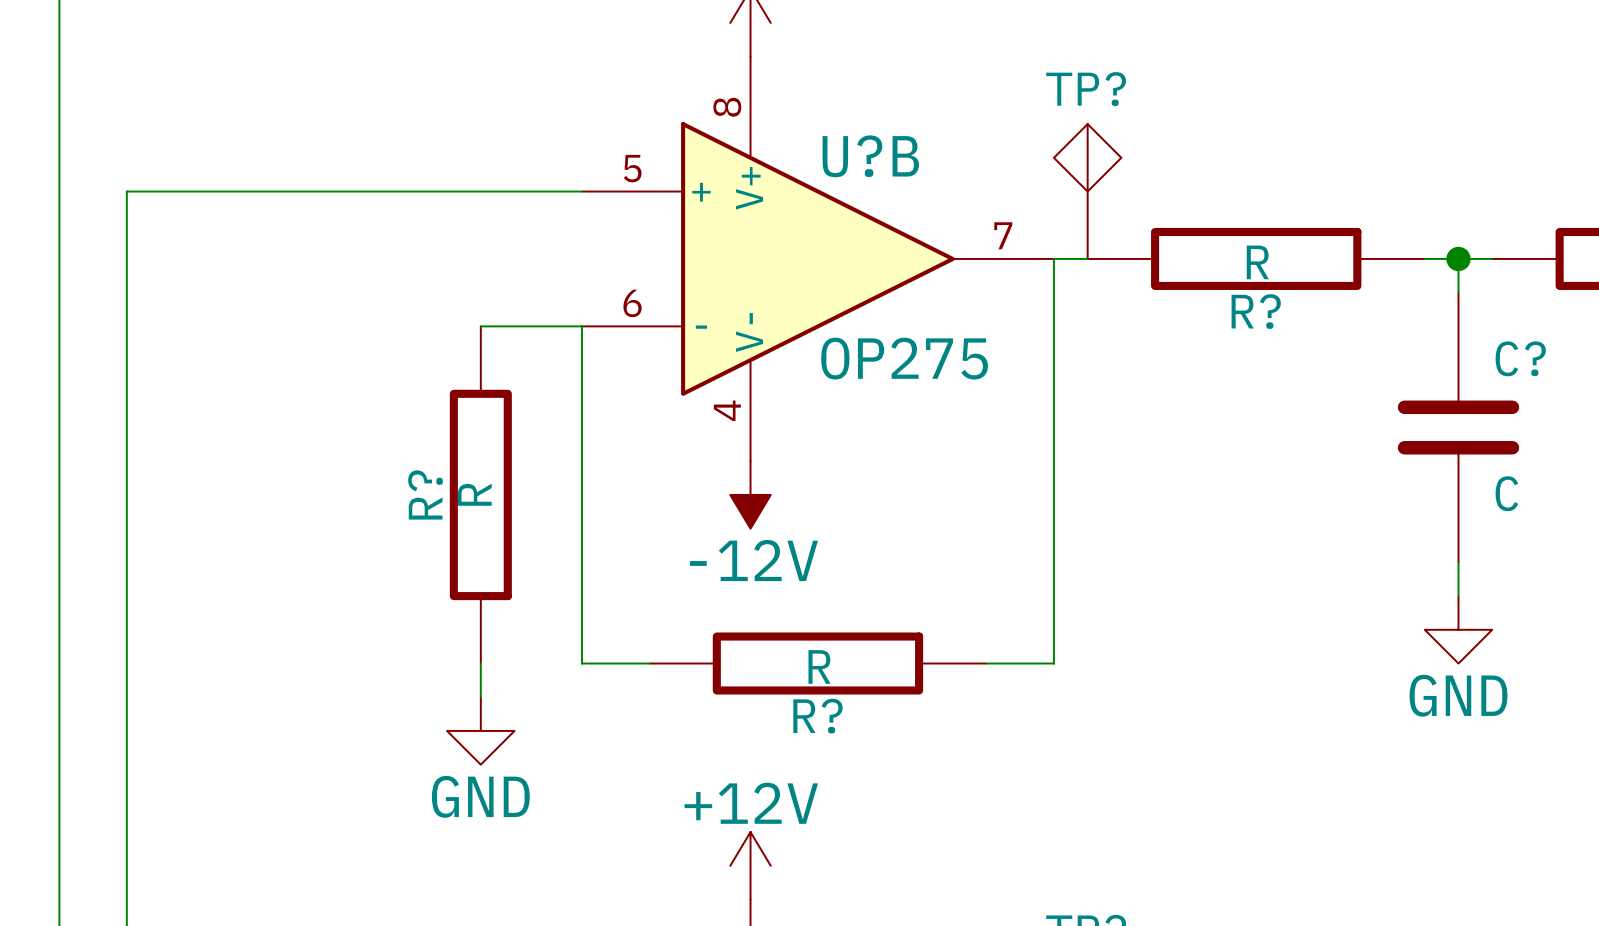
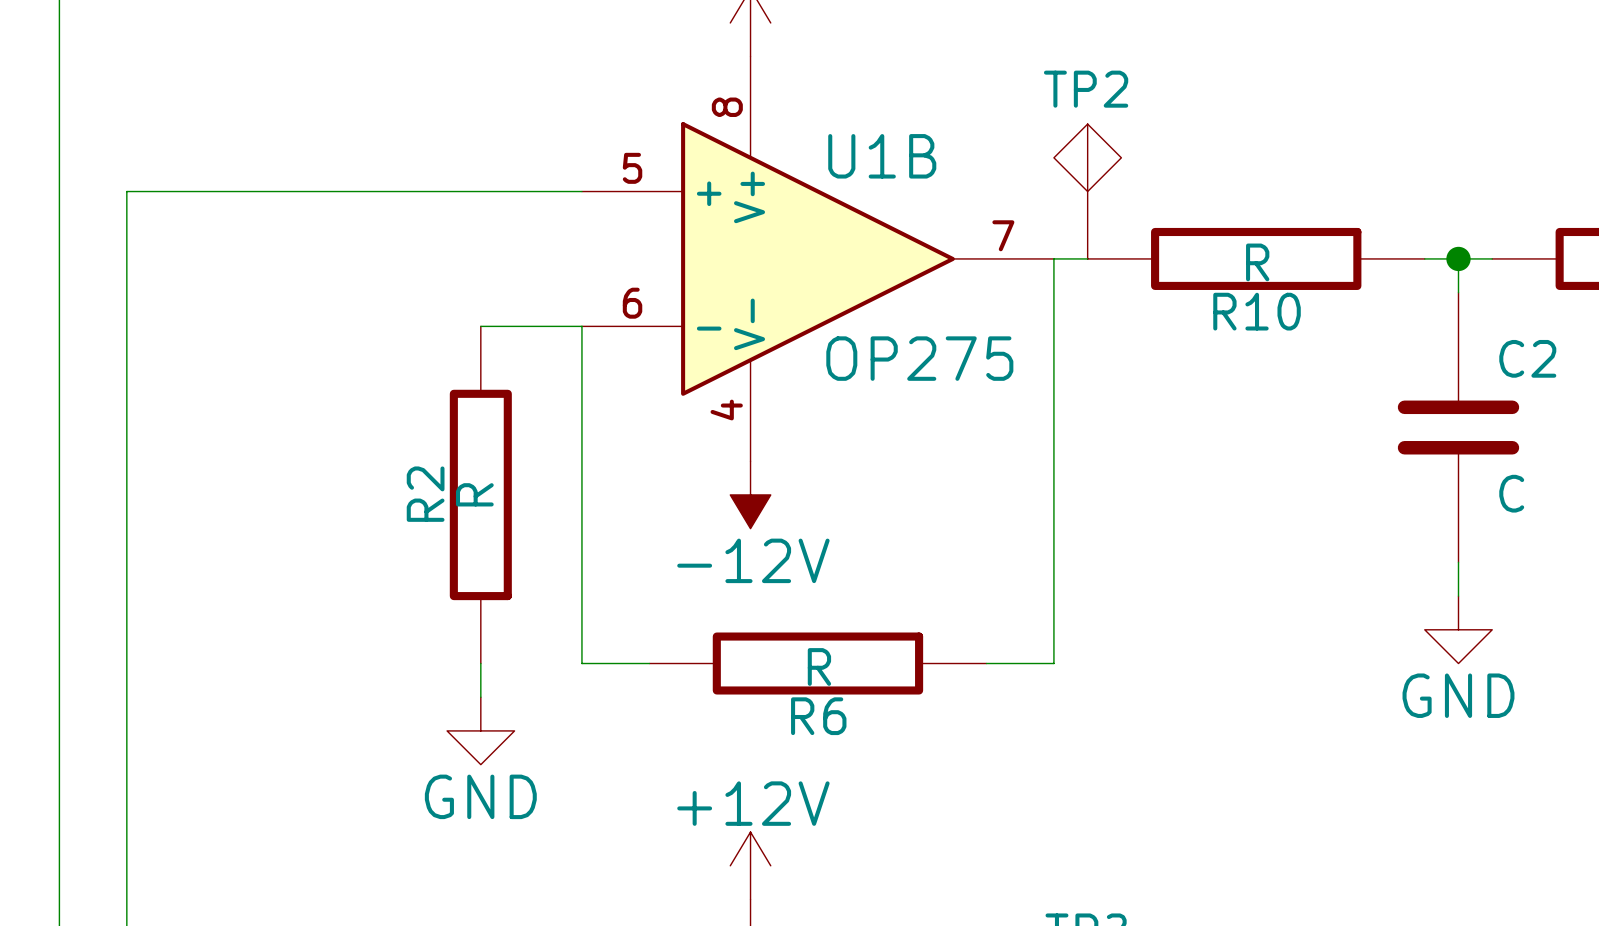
TP? name: TP? (1086, 89) -> TP2 (1086, 89)
U?B name: U?B (870, 156) -> U1B (882, 156)
R? name: R? (1256, 311) -> R10 (1257, 311)
C? name: C? (1520, 358) -> C2 (1527, 358)
R? name: R? (425, 494) -> R2 (425, 494)
R? name: R? (817, 716) -> R6 (818, 716)

